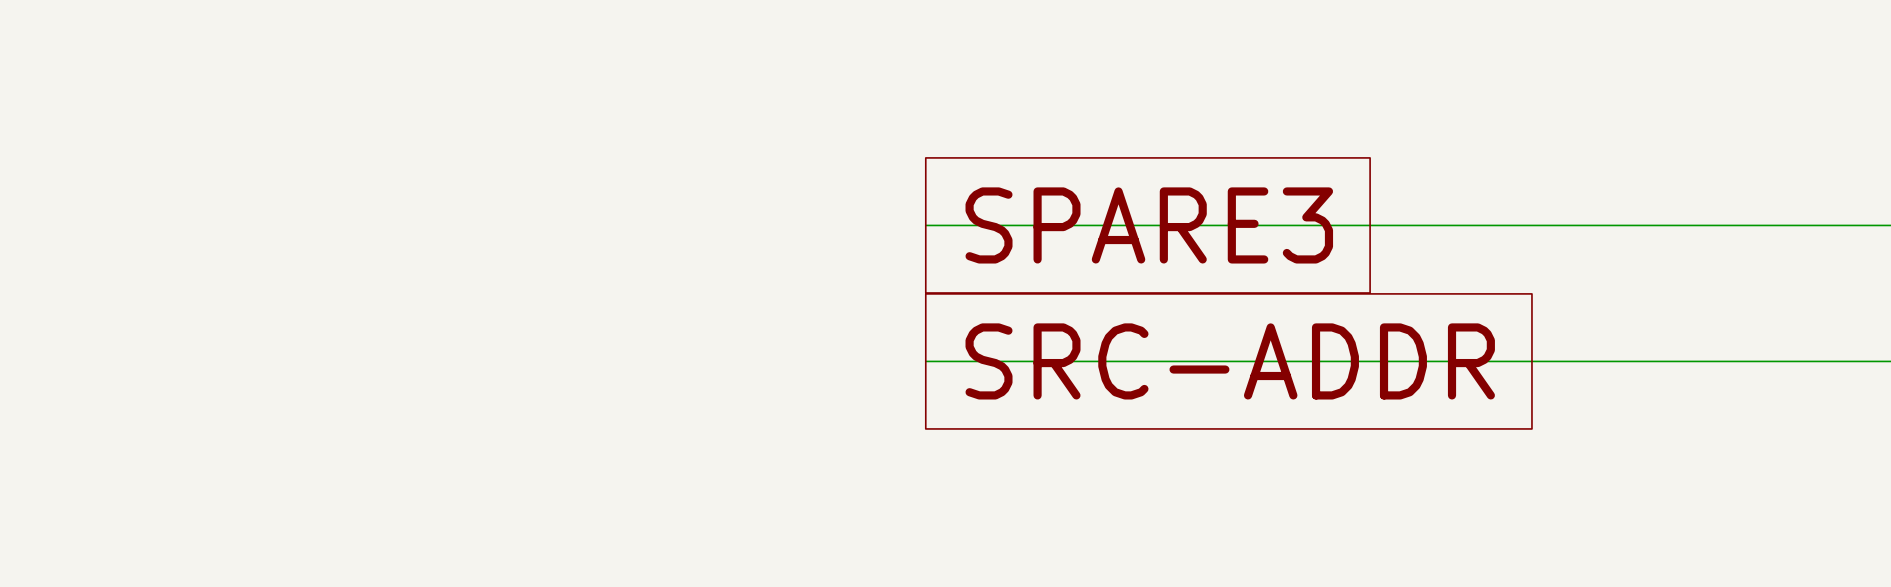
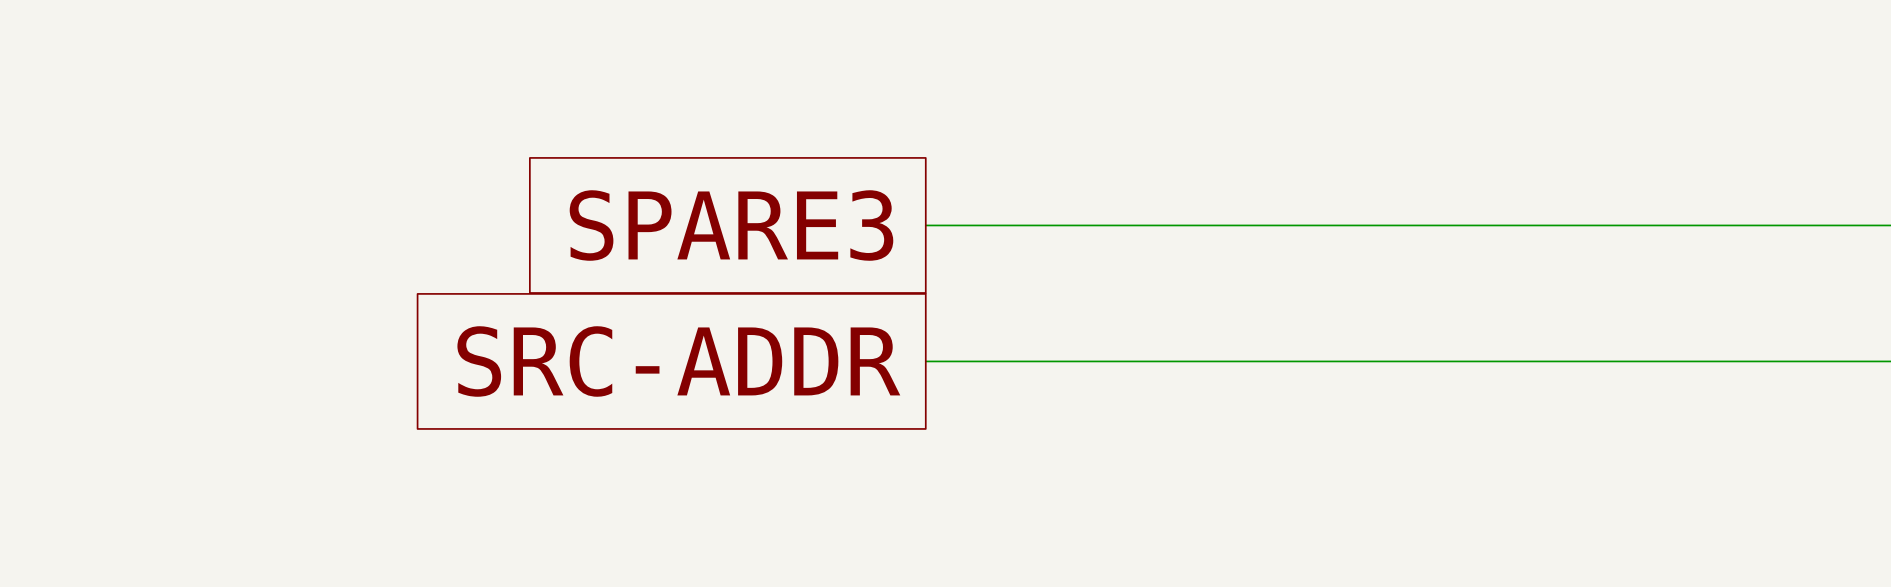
global label rotation: 0° (1149, 225) -> 180° (731, 225)
global label rotation: 0° (1230, 361) -> 180° (678, 361)

